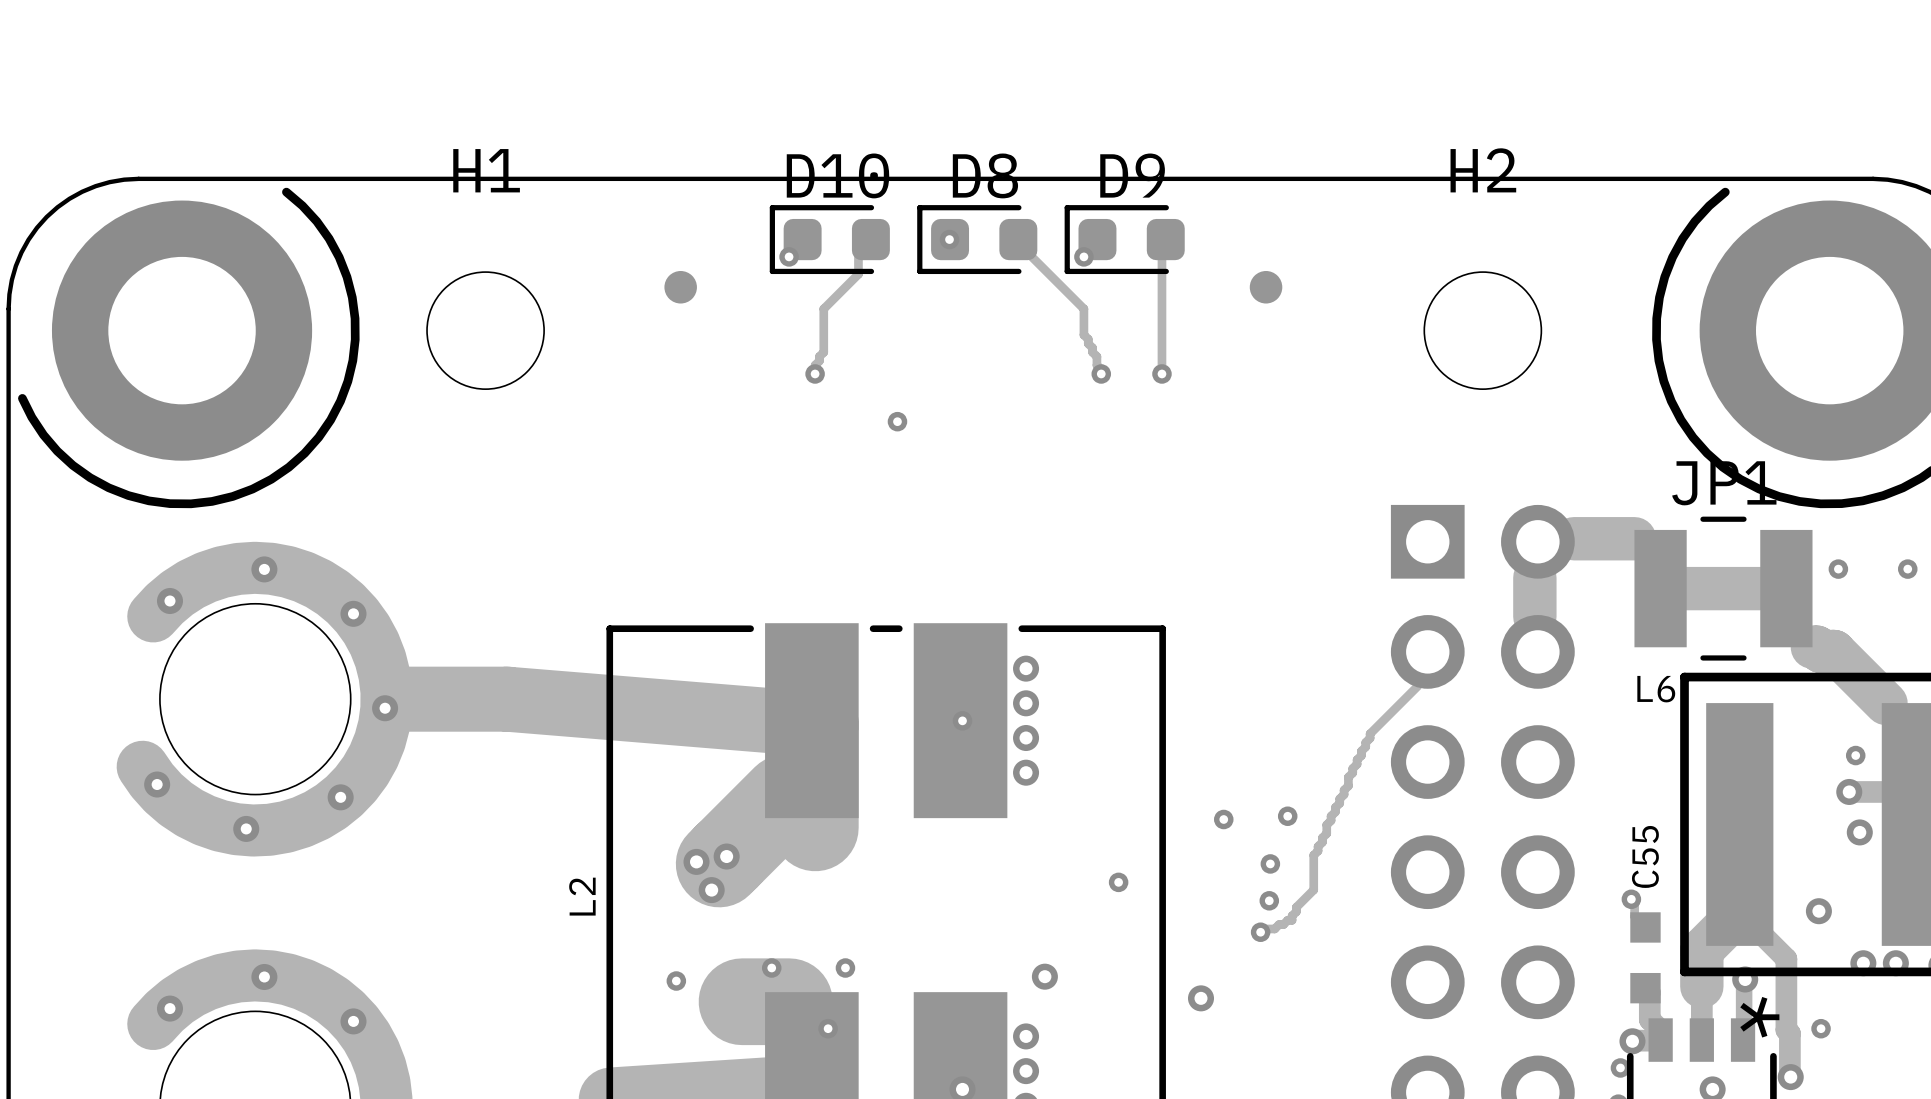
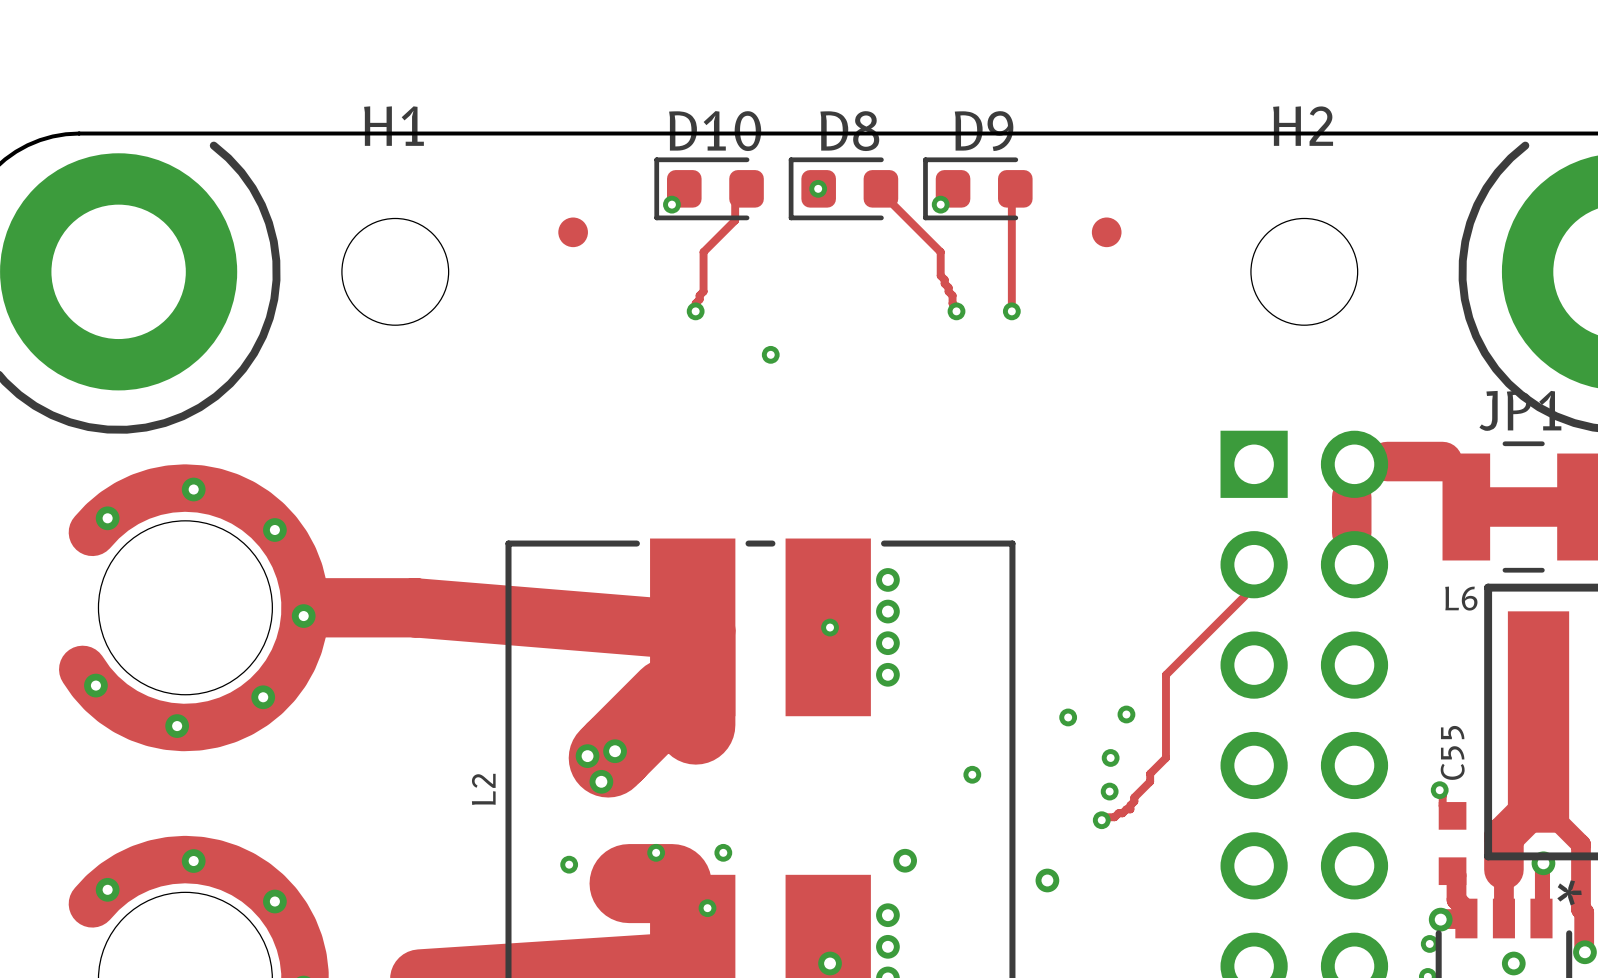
track: (1370, 733) (1370, 738) (1361, 751) (1357, 764) (1348, 777) (1348, 785) (1339, 798) (1335, 811) (1331, 816) -> (1201, 639) (1165, 674) (1165, 714)
track: (1331, 820) (1326, 824) (1326, 833) (1313, 855) (1313, 881) -> (1165, 718) (1165, 757) (1150, 773)

